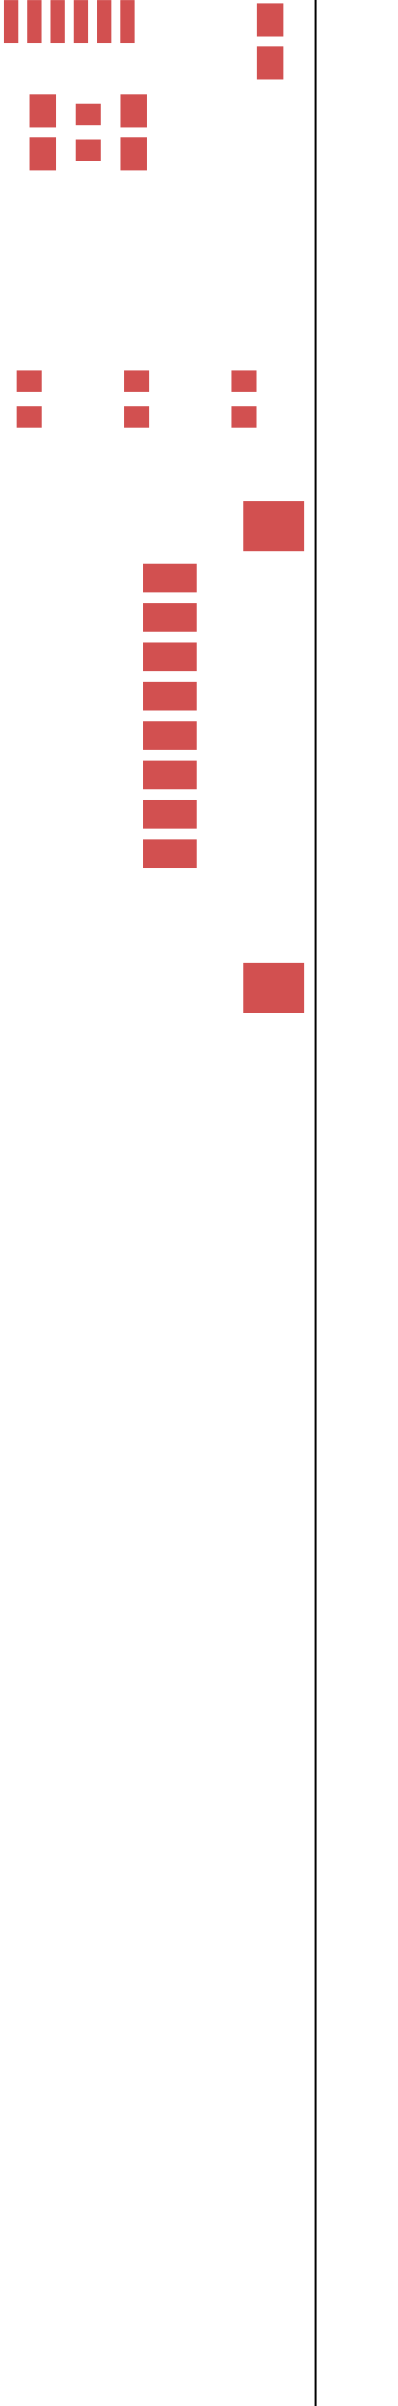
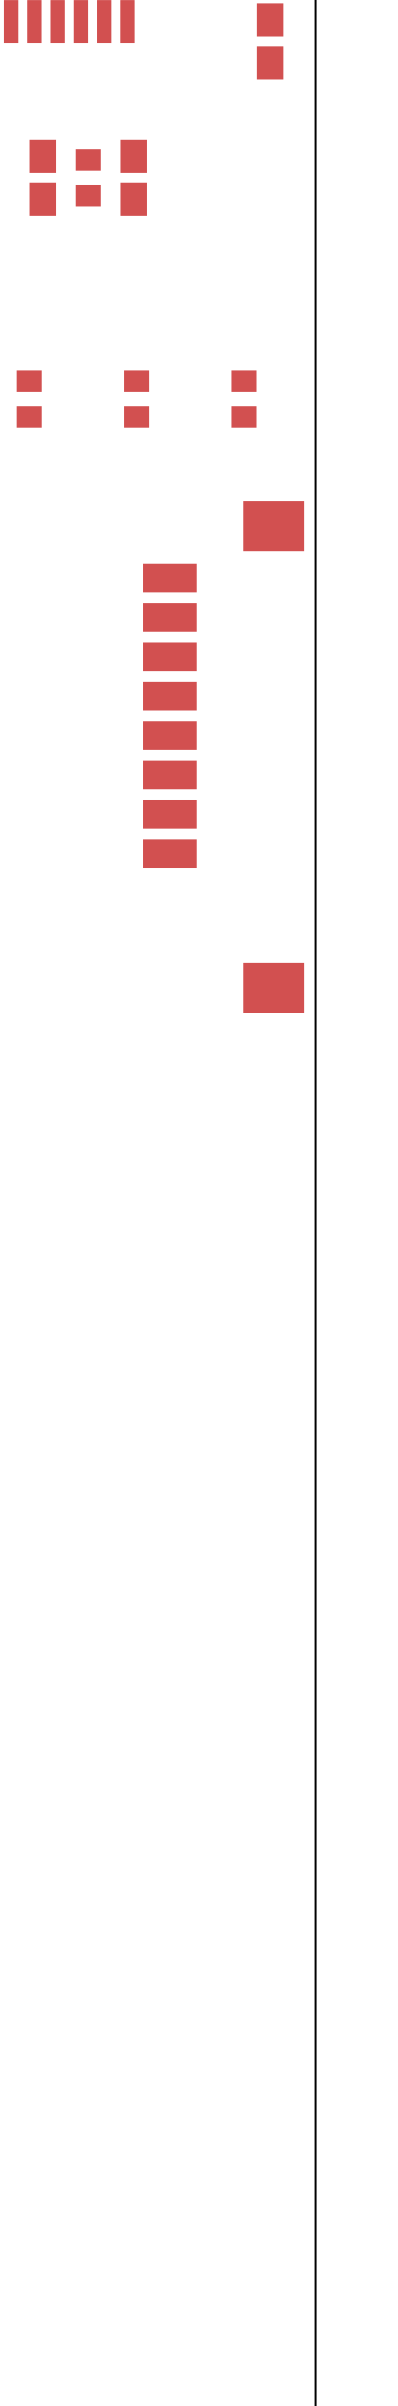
part position: (42, 132) -> (42, 177)
part position: (88, 132) -> (88, 177)
part position: (133, 132) -> (133, 177)

